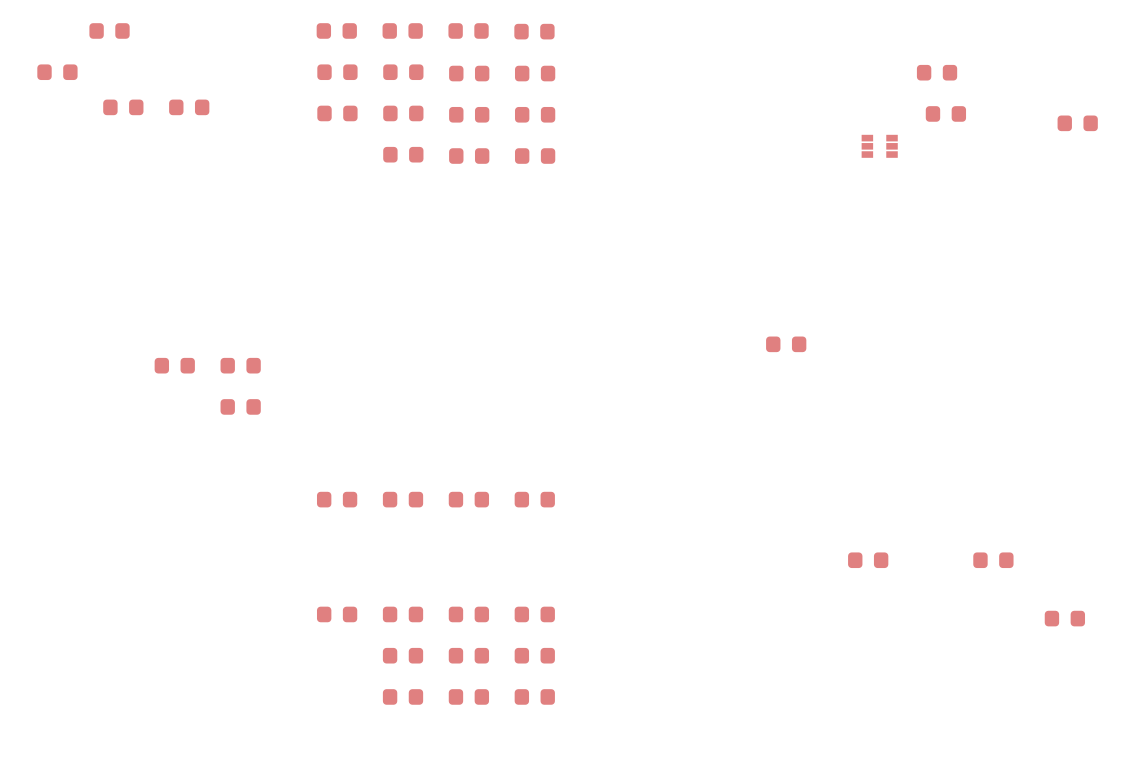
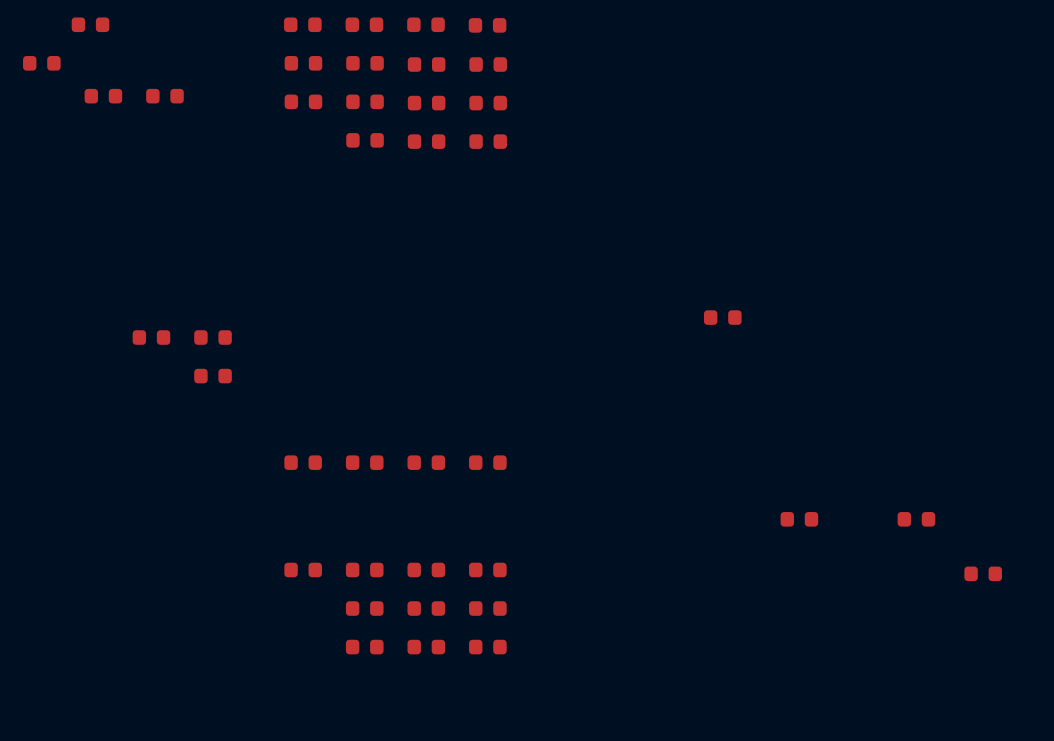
part: (937, 72) -> none
part: (945, 113) -> none
part: (1077, 123) -> none
part: (879, 146) -> none

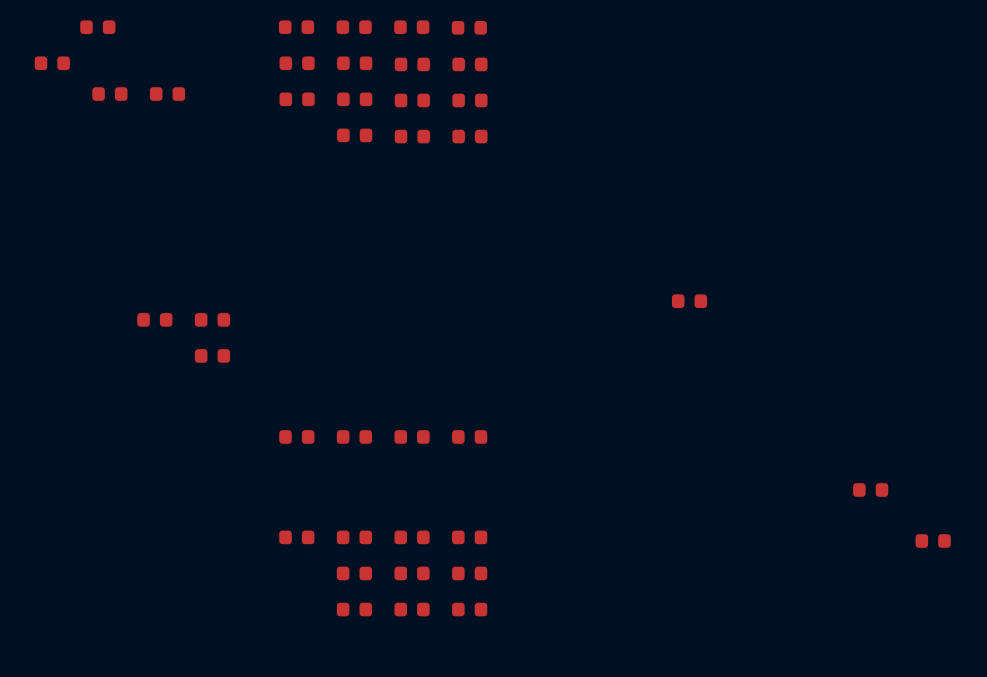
part: (799, 519) -> none

